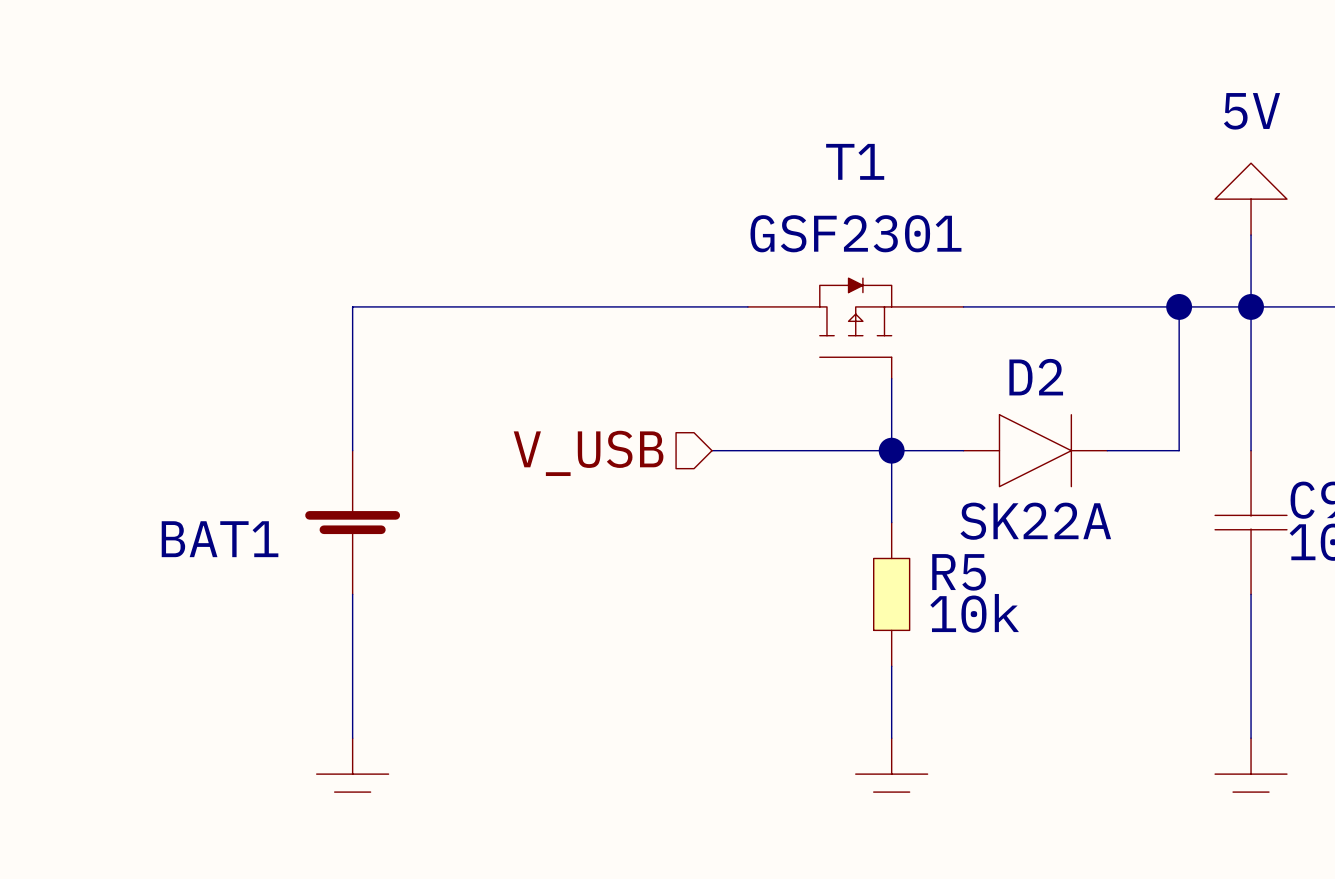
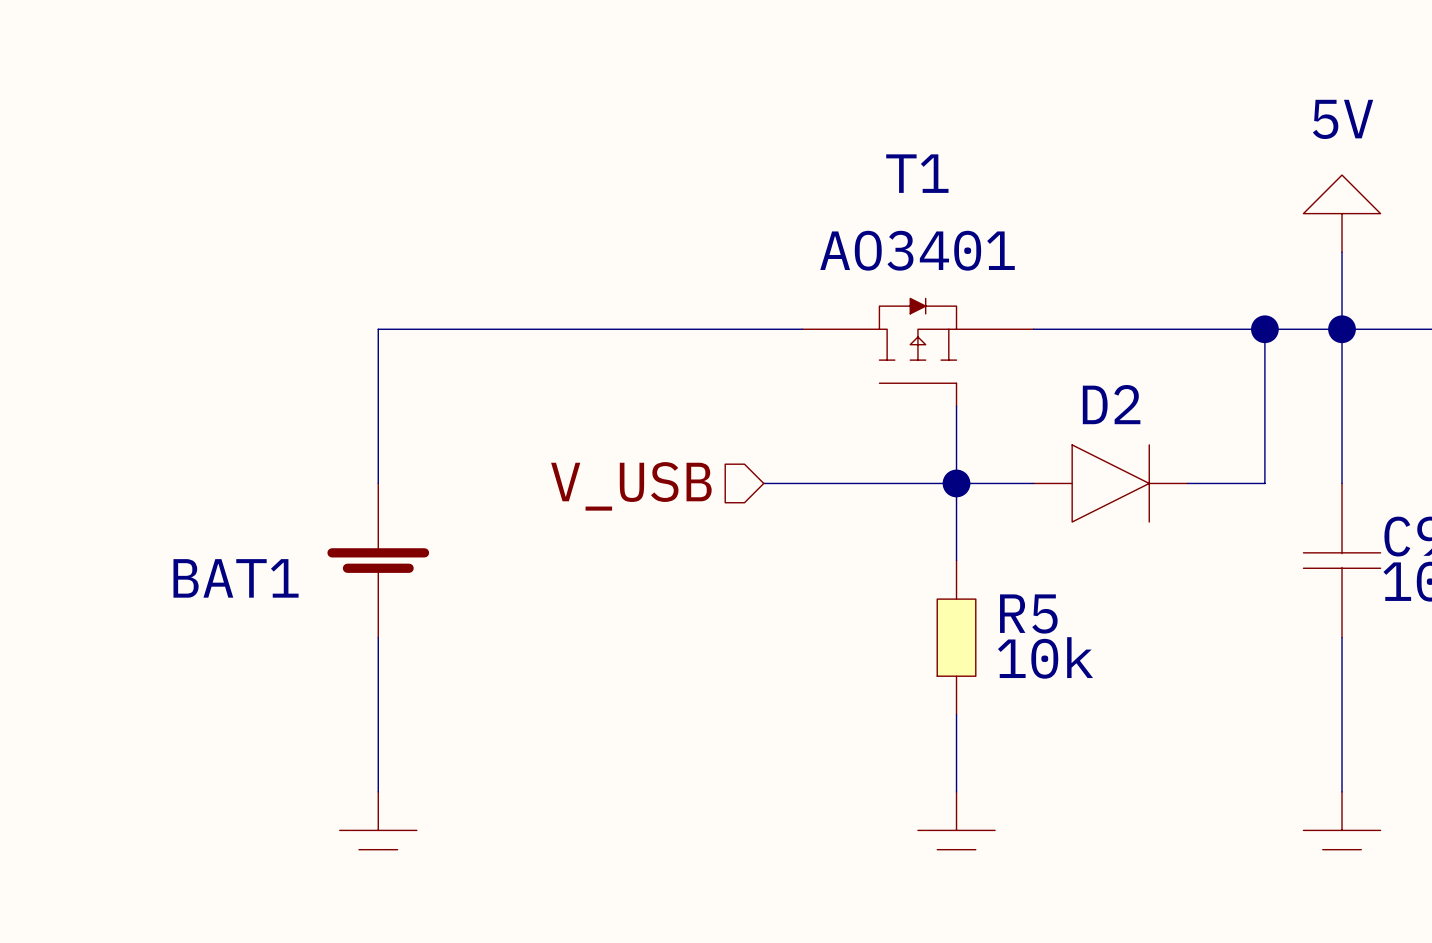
T1 value: GSF2301 (855, 233) -> AO3401 (917, 250)
D2 value: SK22A (1035, 521) -> none

